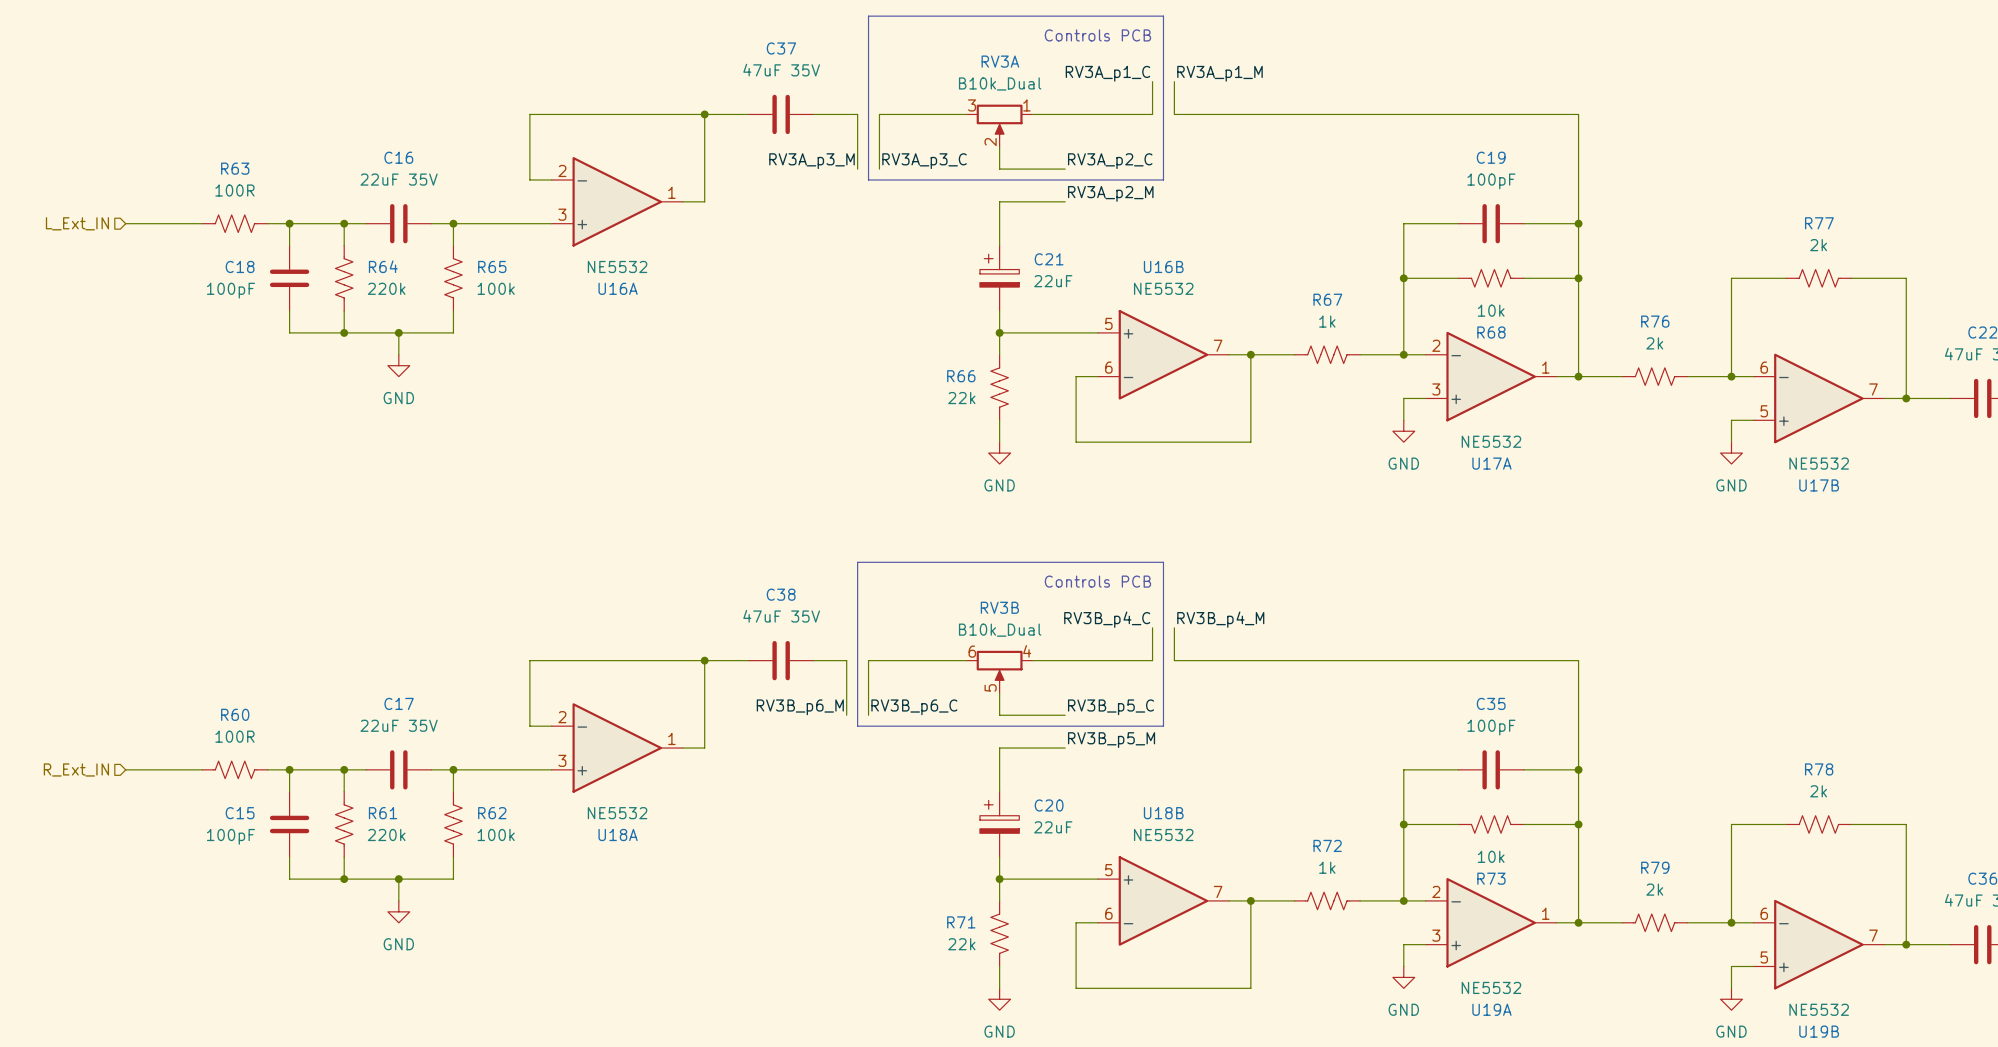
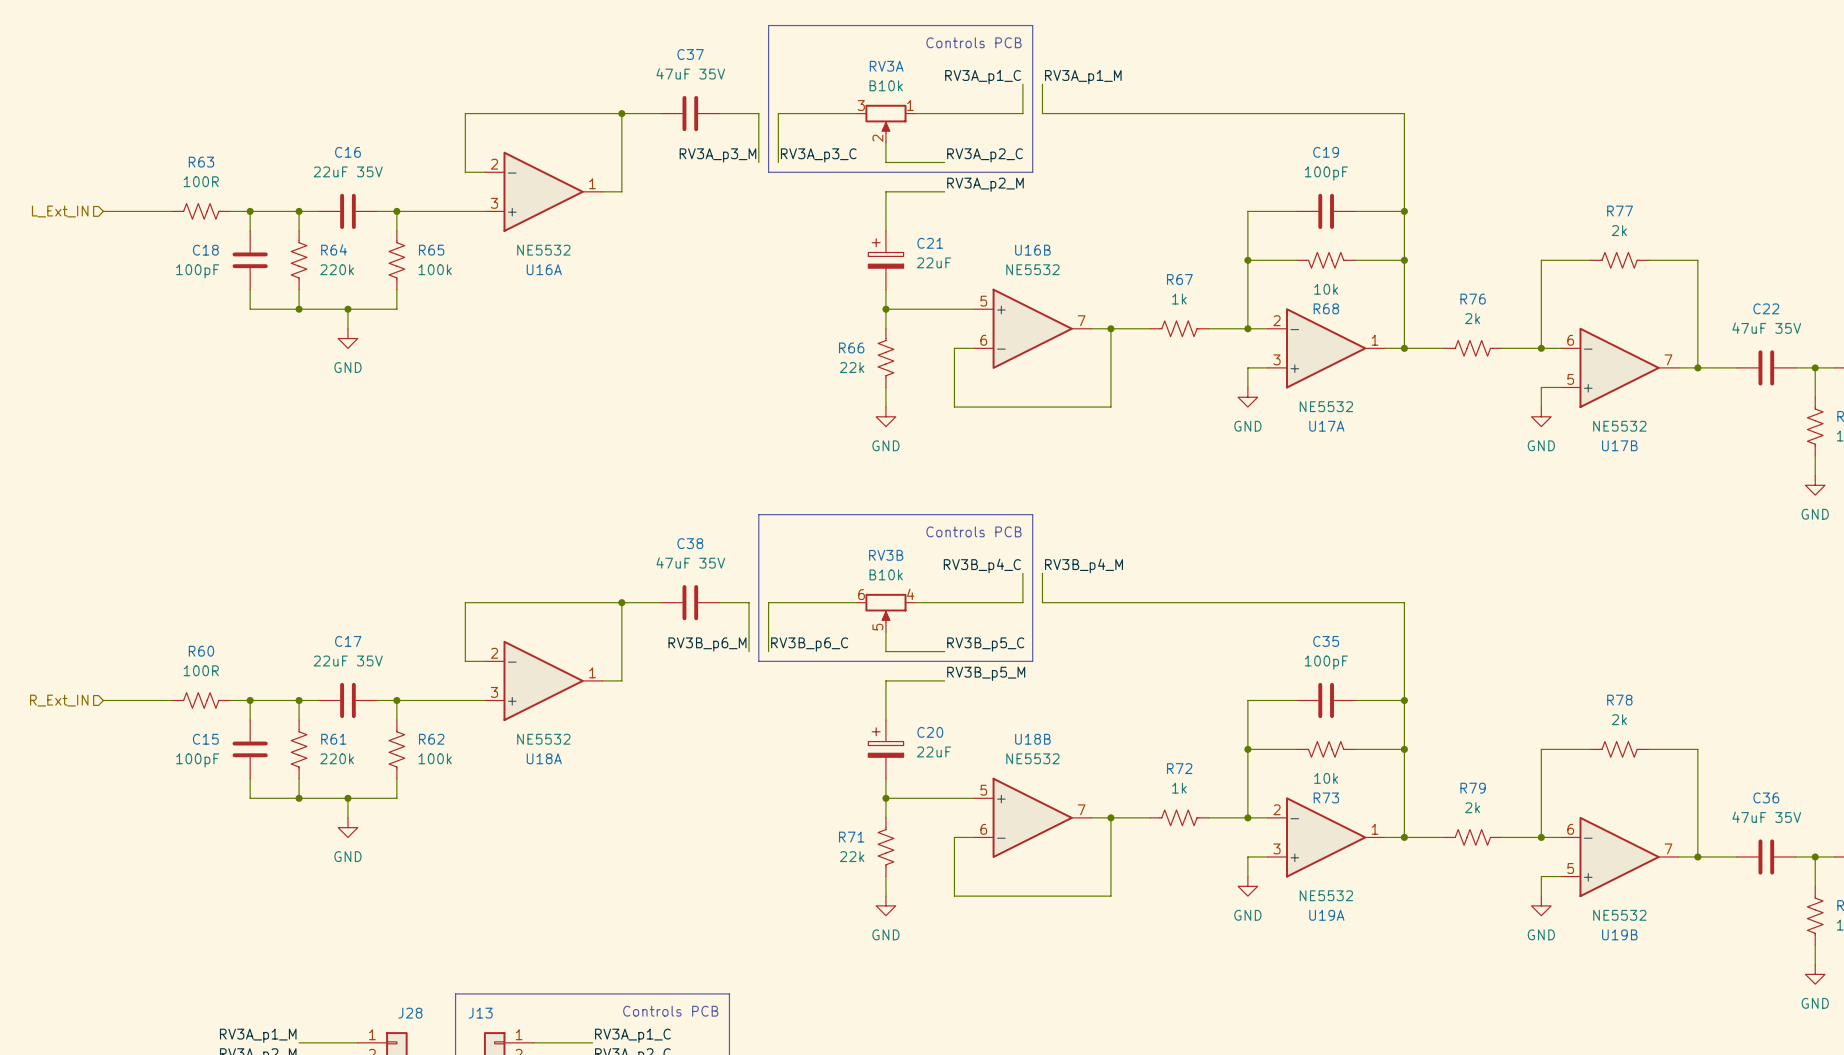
RV3A value: B10k_Dual (1000, 83) -> B10k (886, 85)
RV3B value: B10k_Dual (1000, 630) -> B10k (886, 574)

